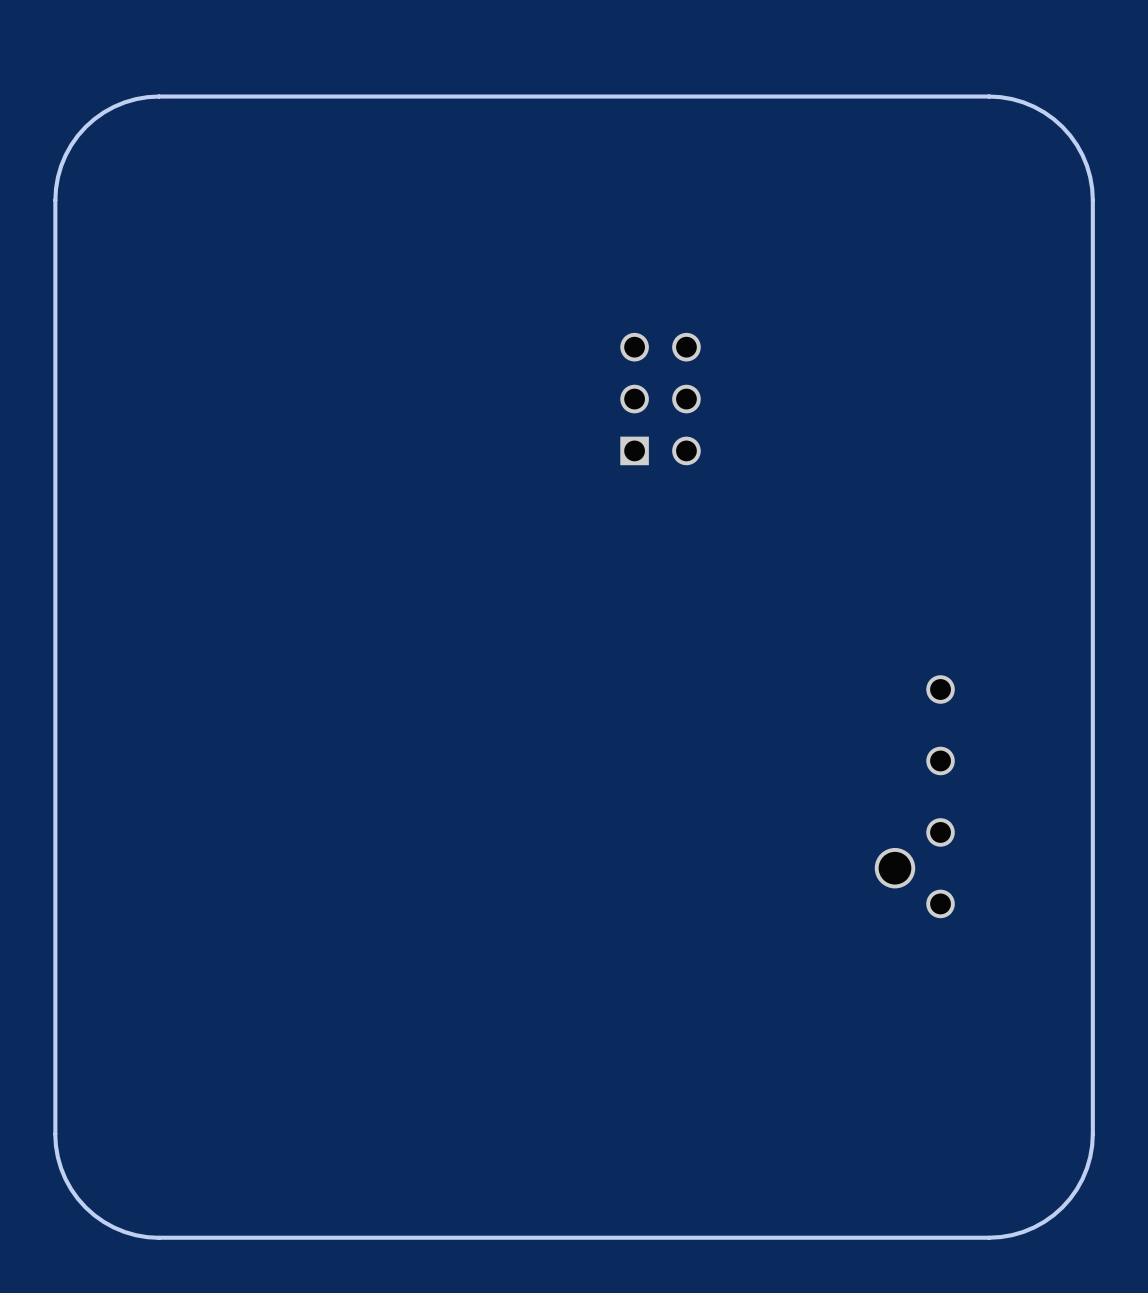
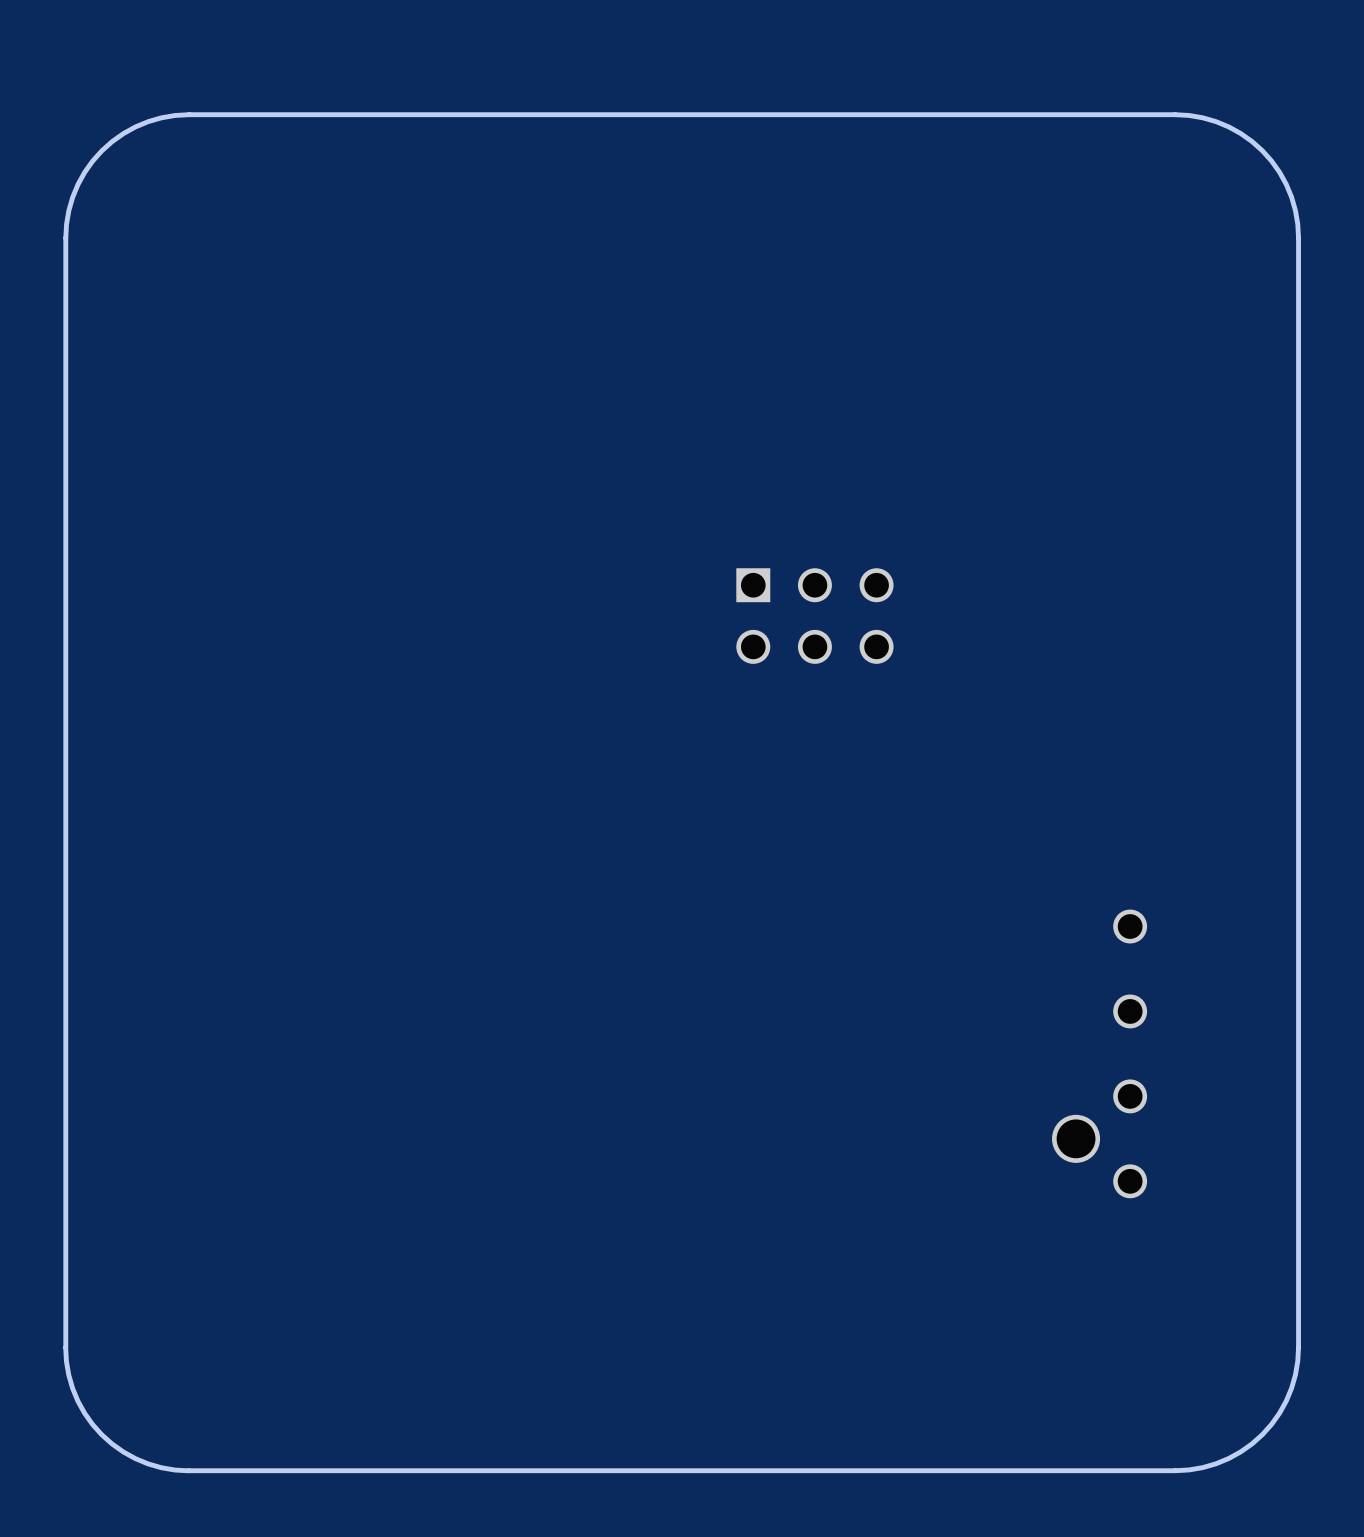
part rotation: 0° (660, 399) -> 90° clockwise (814, 616)
part position: (660, 399) -> (814, 616)
part position: (914, 796) -> (1099, 1053)

